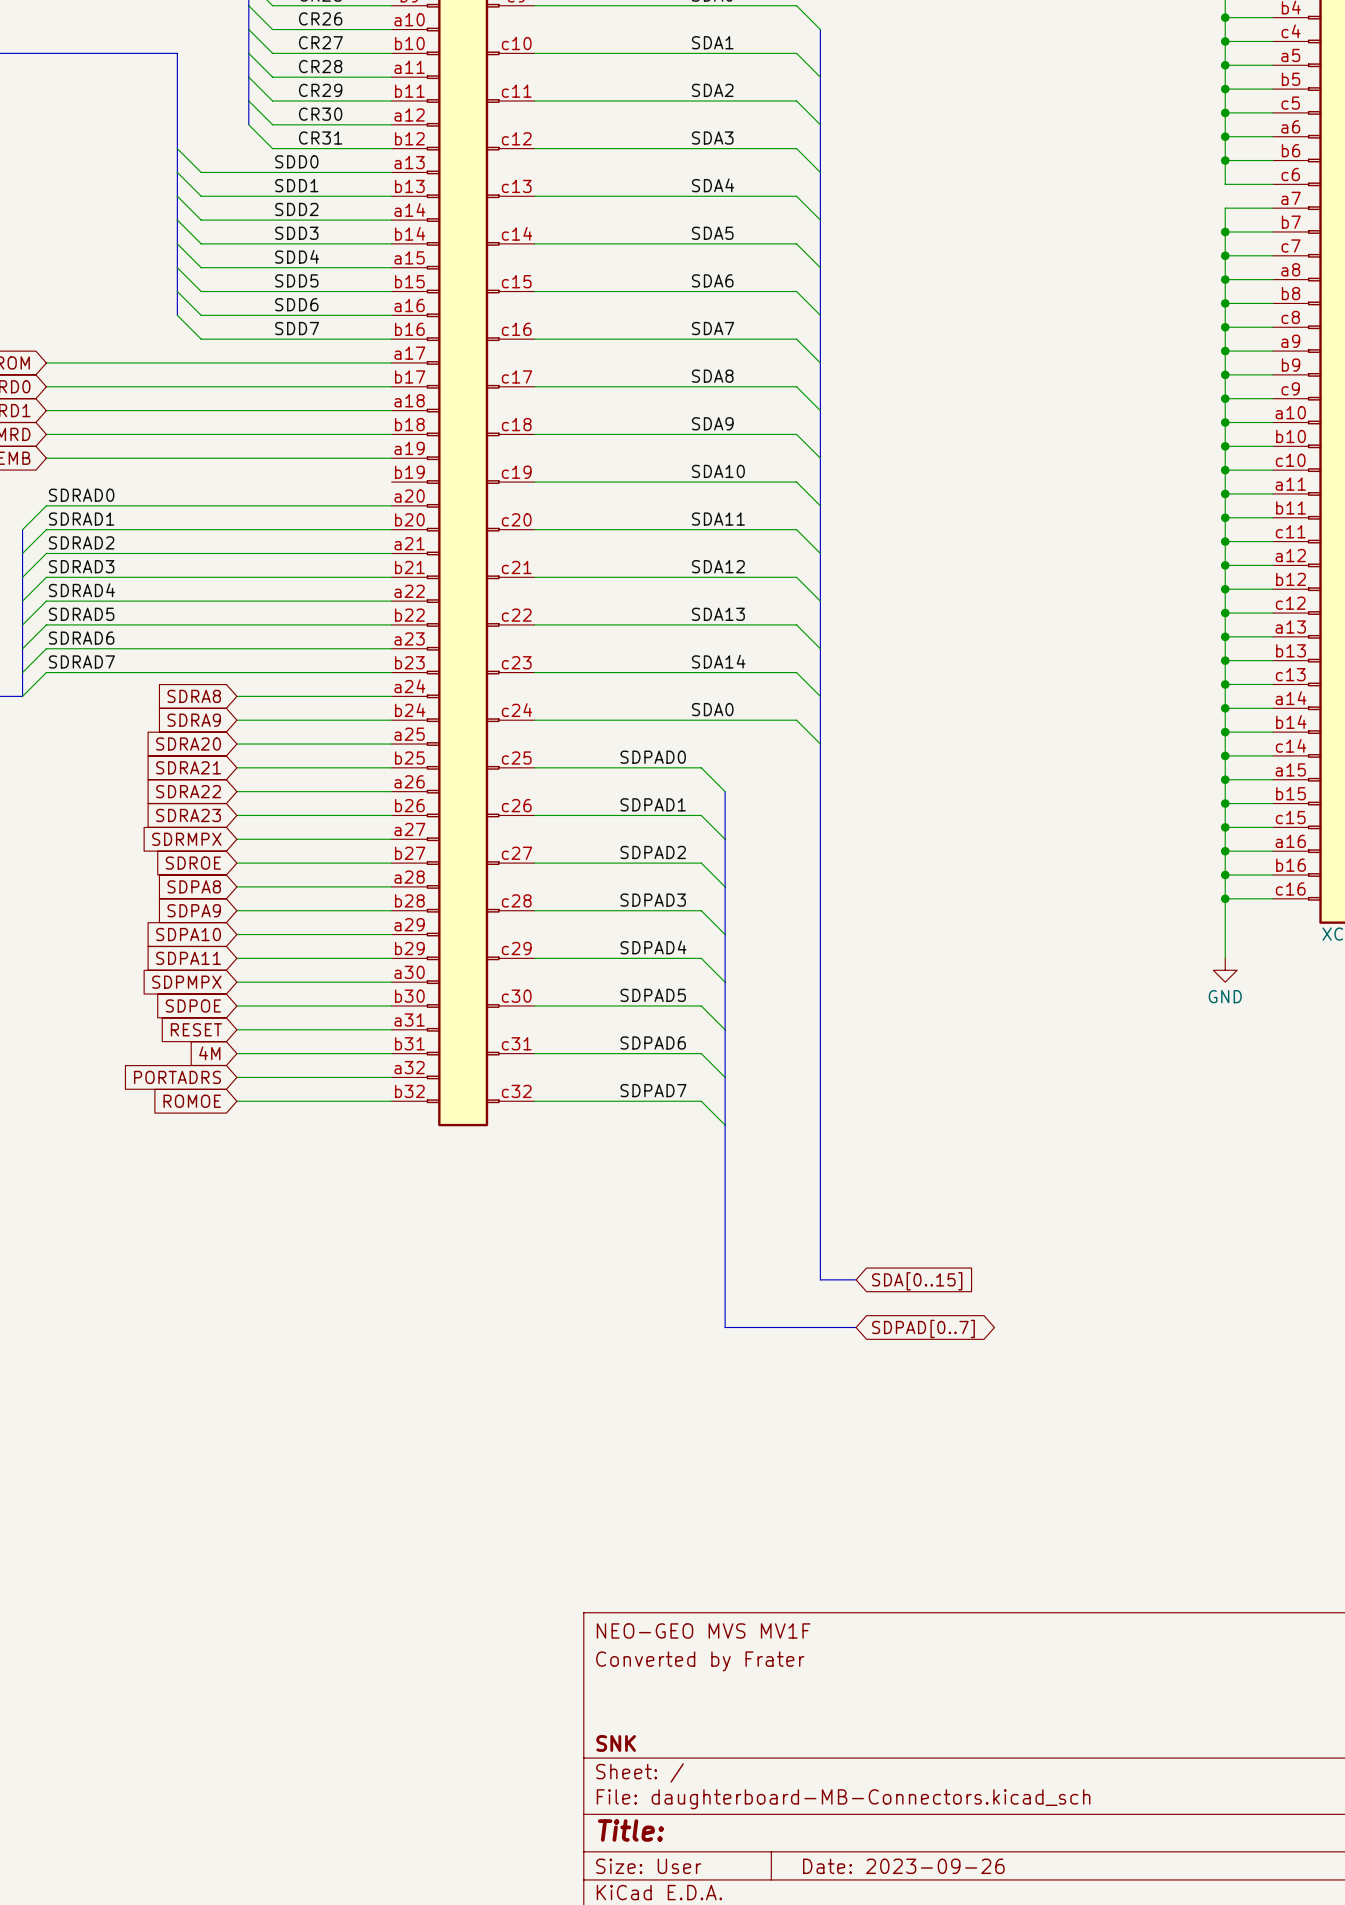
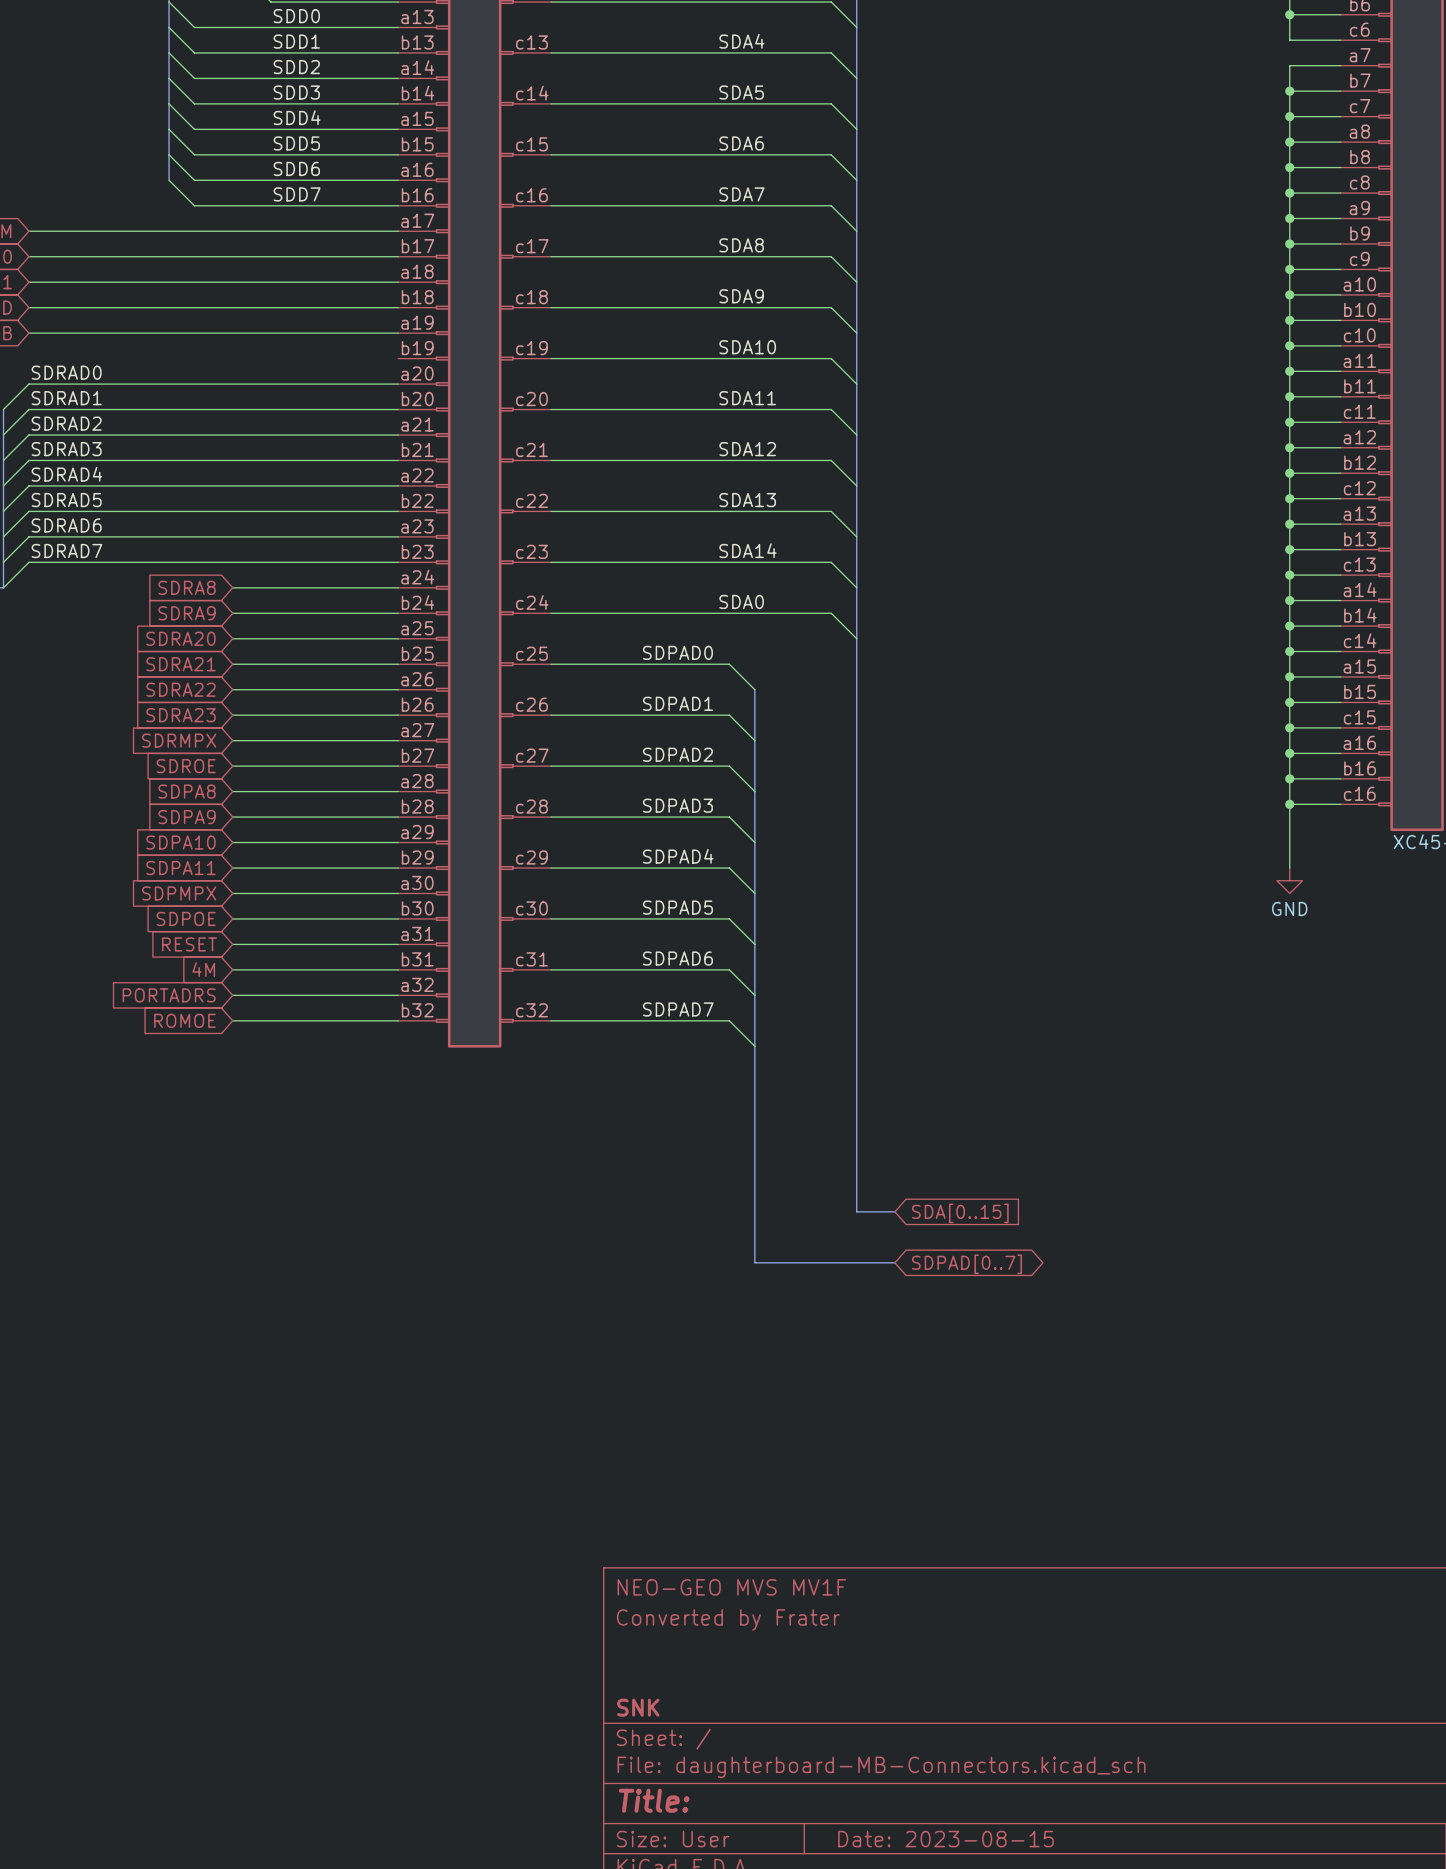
title block: Date: 2023-09-26 (903, 1866) -> Date: 2023-08-15 (946, 1839)

